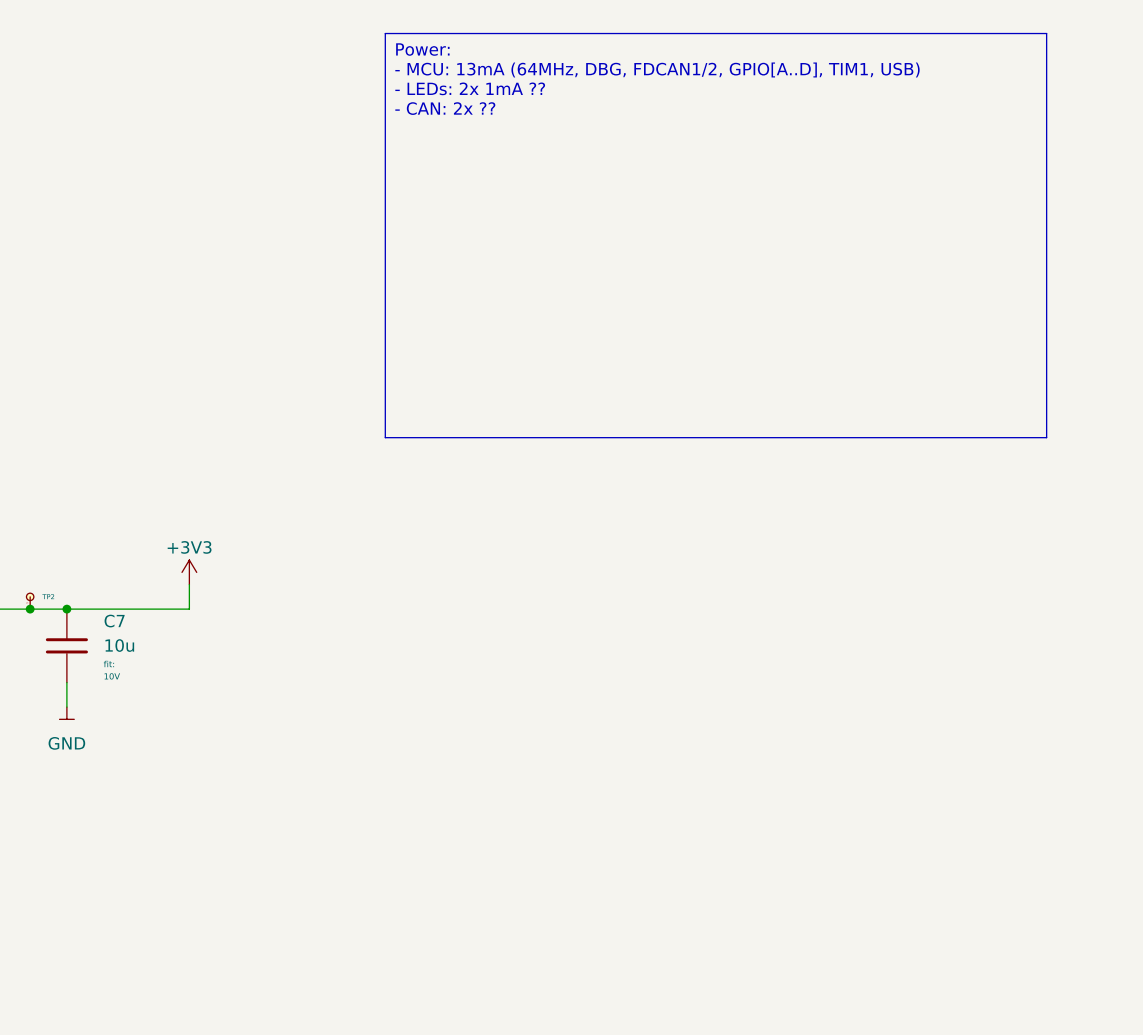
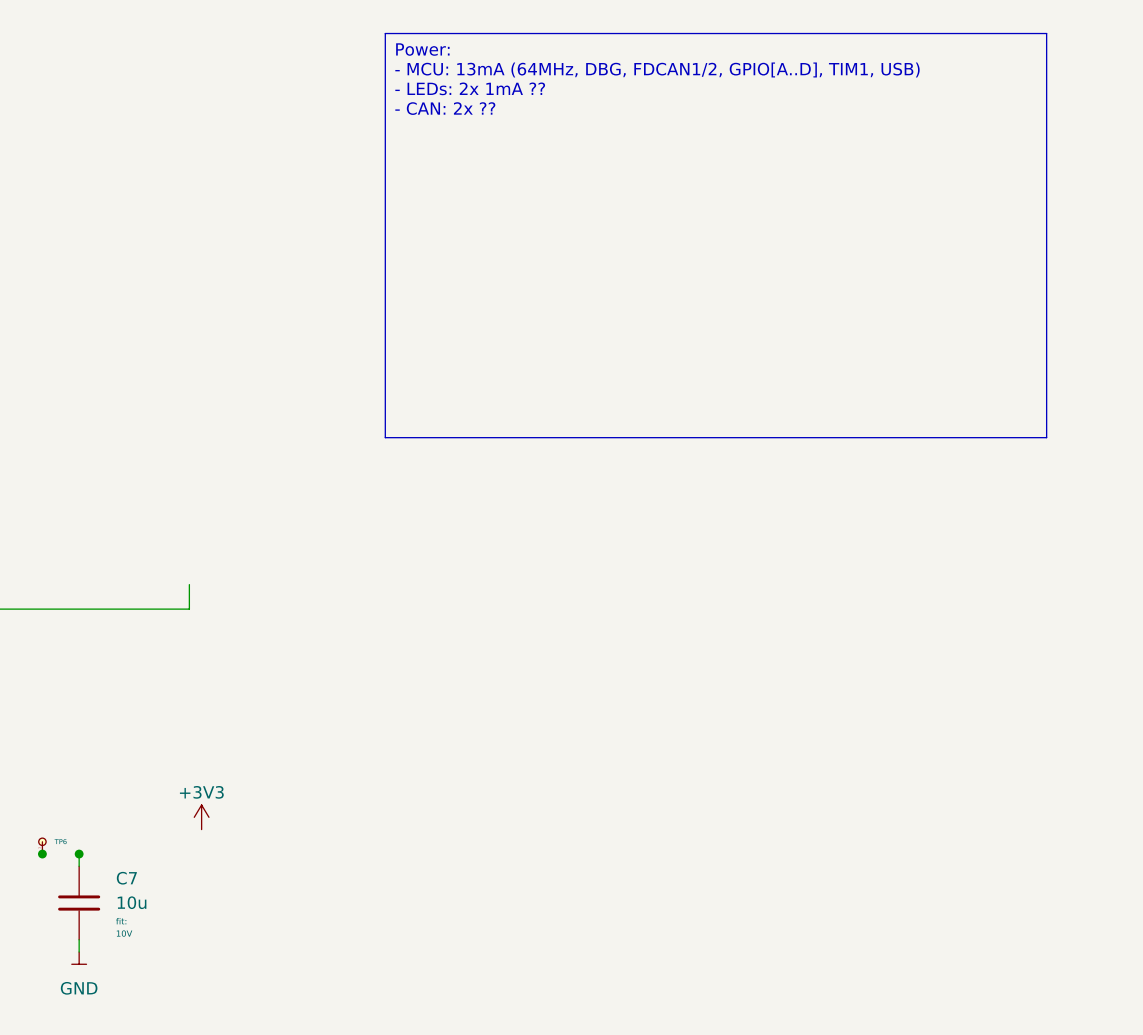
power symbol: +3V3 (189, 572) -> none
part: (30, 601) -> none
junction: (30, 609) -> none
junction: (66, 609) -> none
C7 position: (66, 645) -> (79, 903)
wire: (66, 682) (66, 707) -> none
power symbol: GND (66, 713) -> none
power symbol: none -> +3V3 (201, 817)
part: none -> (42, 846)
junction: none -> (42, 854)
wire: none -> (79, 854) (79, 866)
junction: none -> (79, 854)
wire: none -> (79, 939) (79, 952)
power symbol: none -> GND (79, 958)

